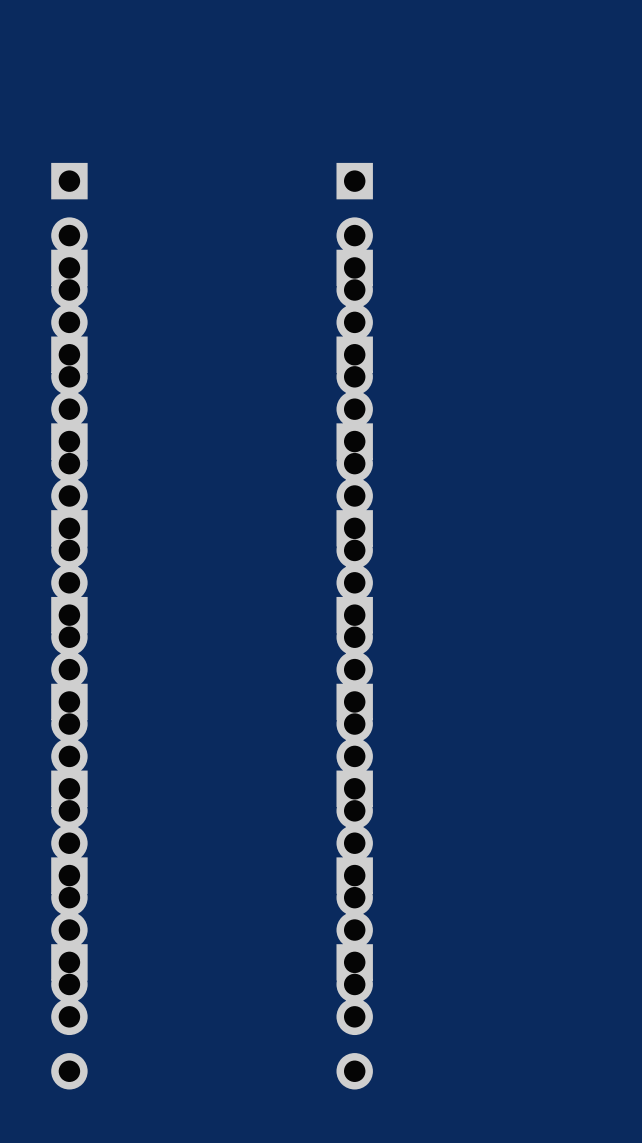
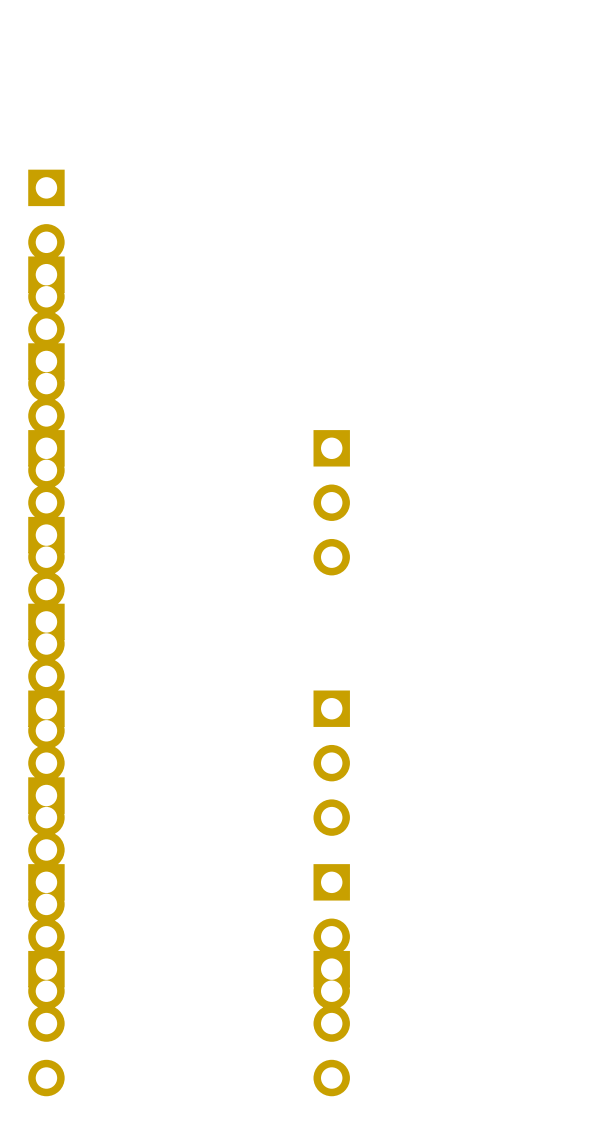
part: (354, 235) -> none
part: (354, 322) -> none
part: (354, 409) -> none
part: (354, 582) -> none
part: (354, 669) -> none
part: (354, 843) -> none

